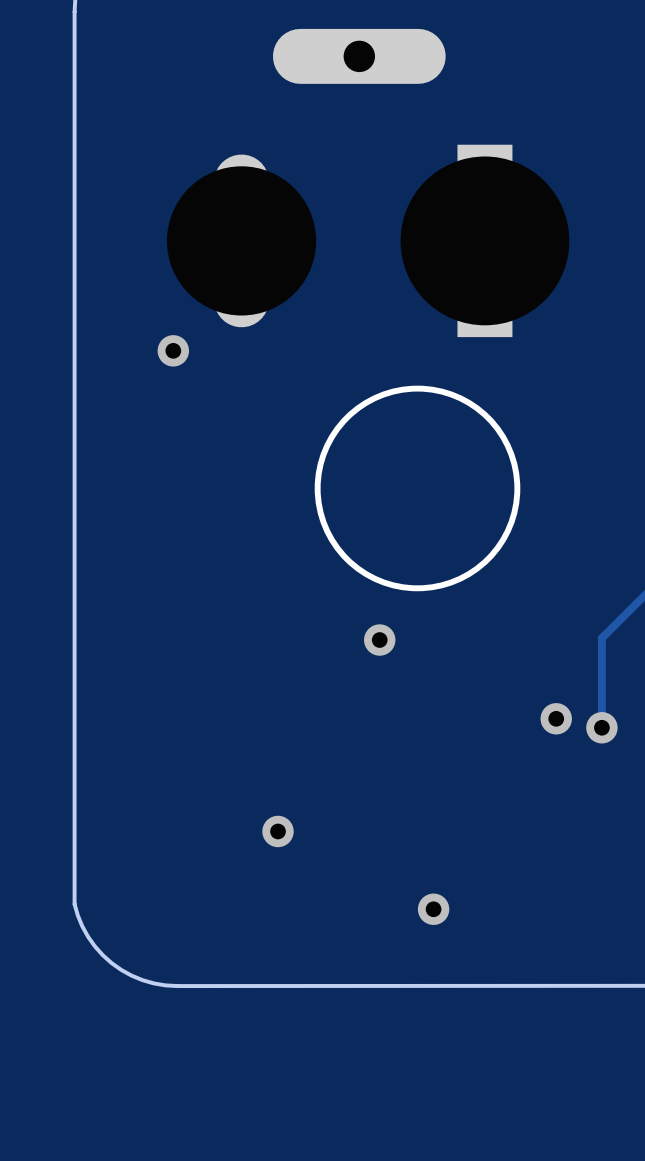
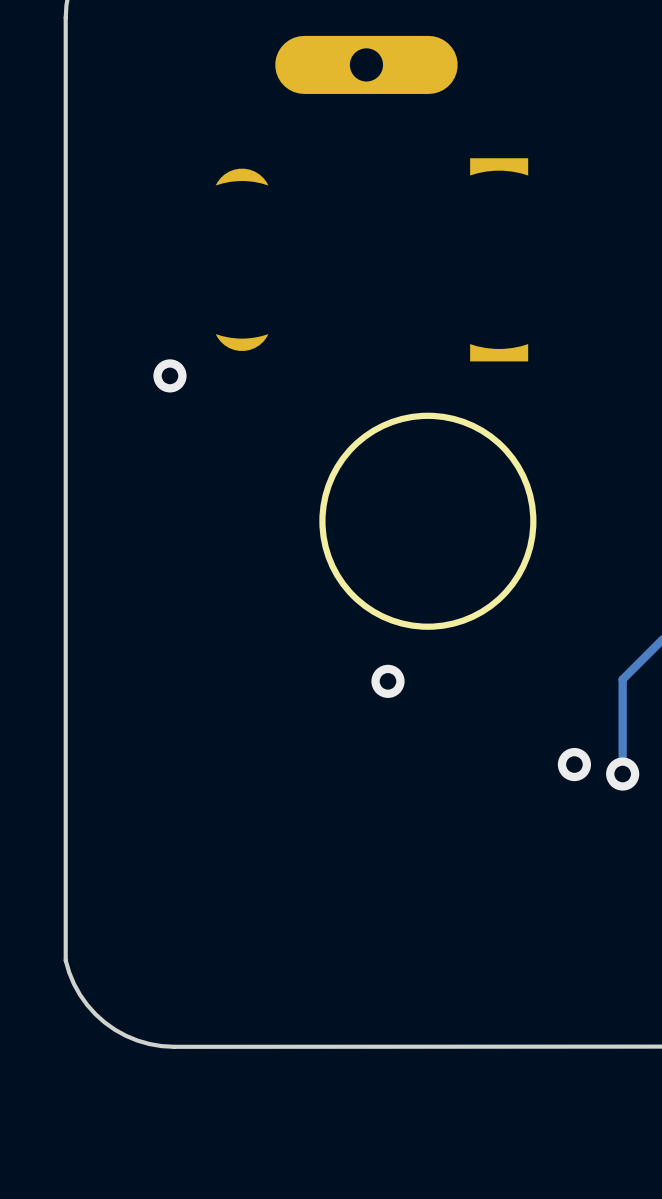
via: (278, 831) -> none
via: (433, 909) -> none

